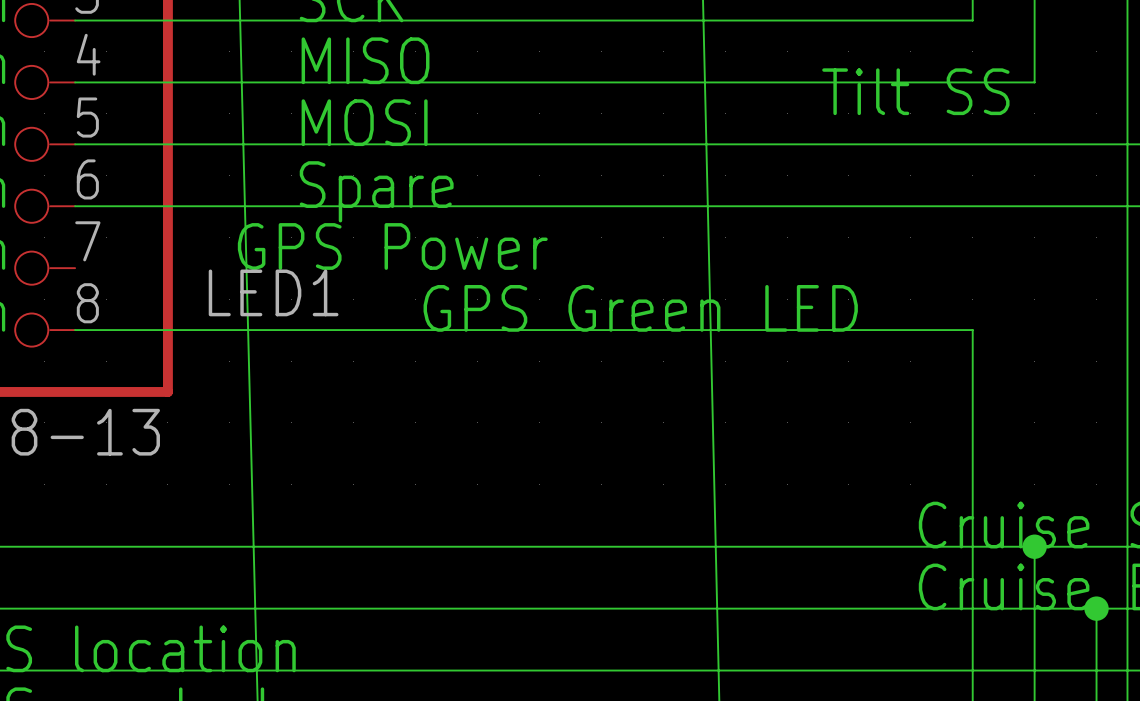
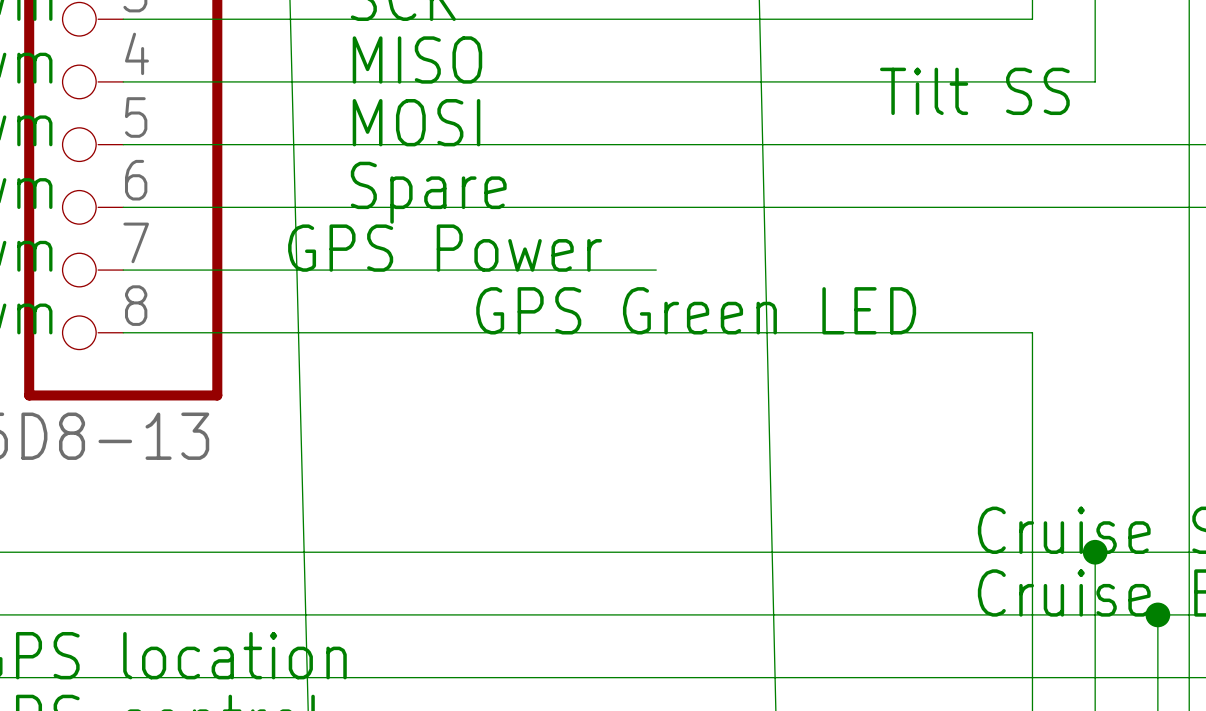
wire: none -> (123, 270) (656, 270)
label: LED1 (273, 292) -> none

